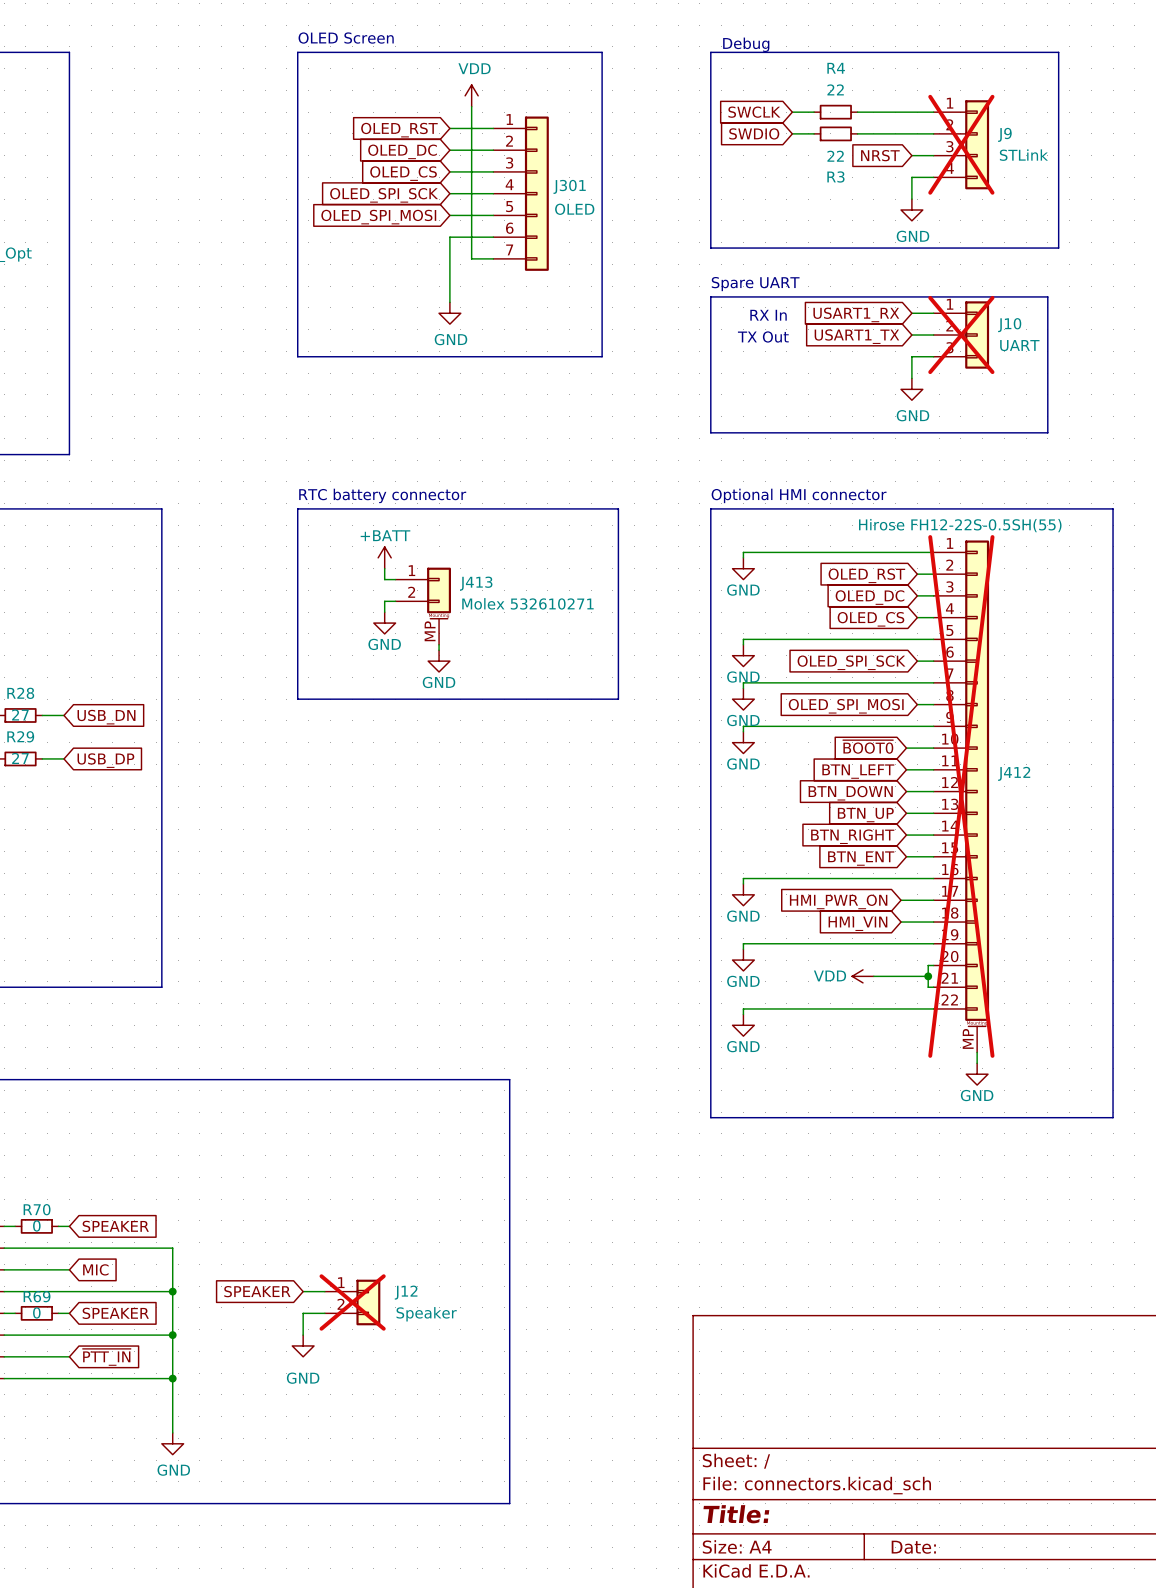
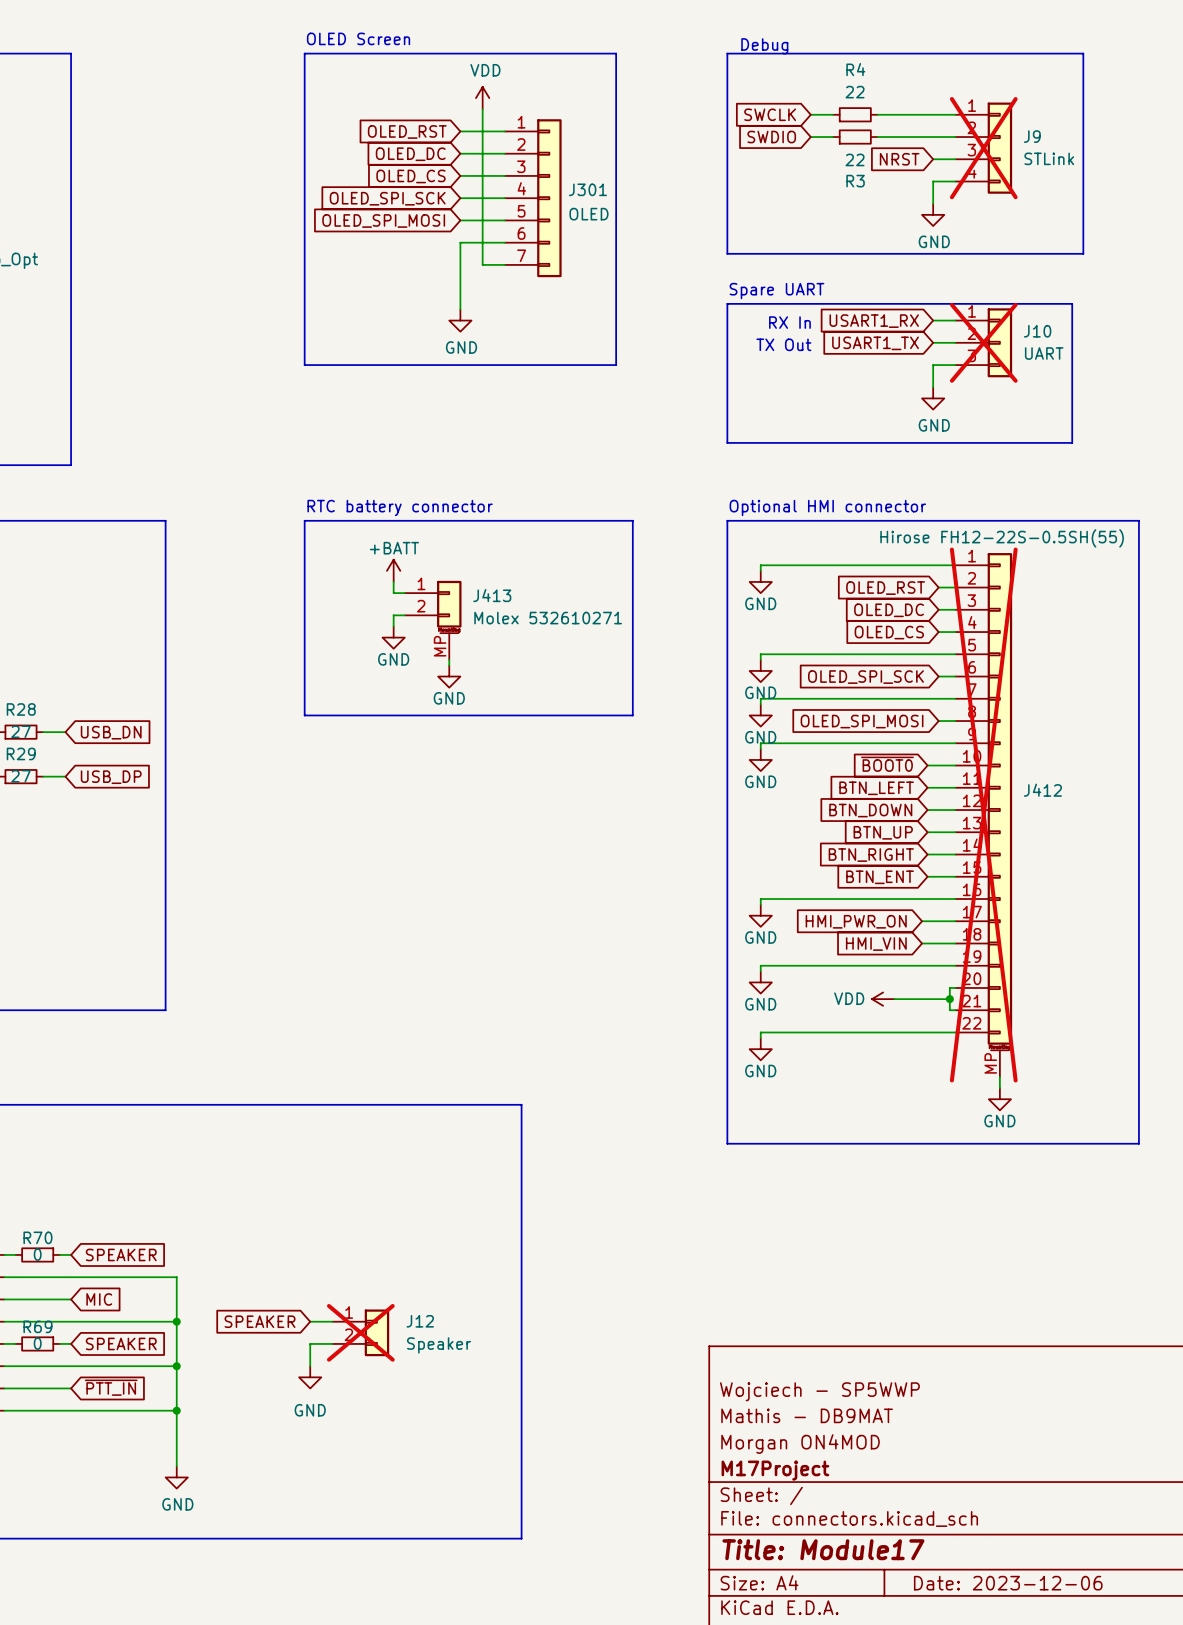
title block: none -> Wojciech - SP5WWP (819, 1391)
title block: none -> Mathis - DB9MAT (807, 1415)
title block: none -> Morgan ON4MOD (800, 1444)
title block: none -> M17Project (775, 1470)
title block: Title: (736, 1514) -> Title: Module17 (823, 1549)
title block: Date: (913, 1547) -> Date: 2023-12-06 (1008, 1583)

